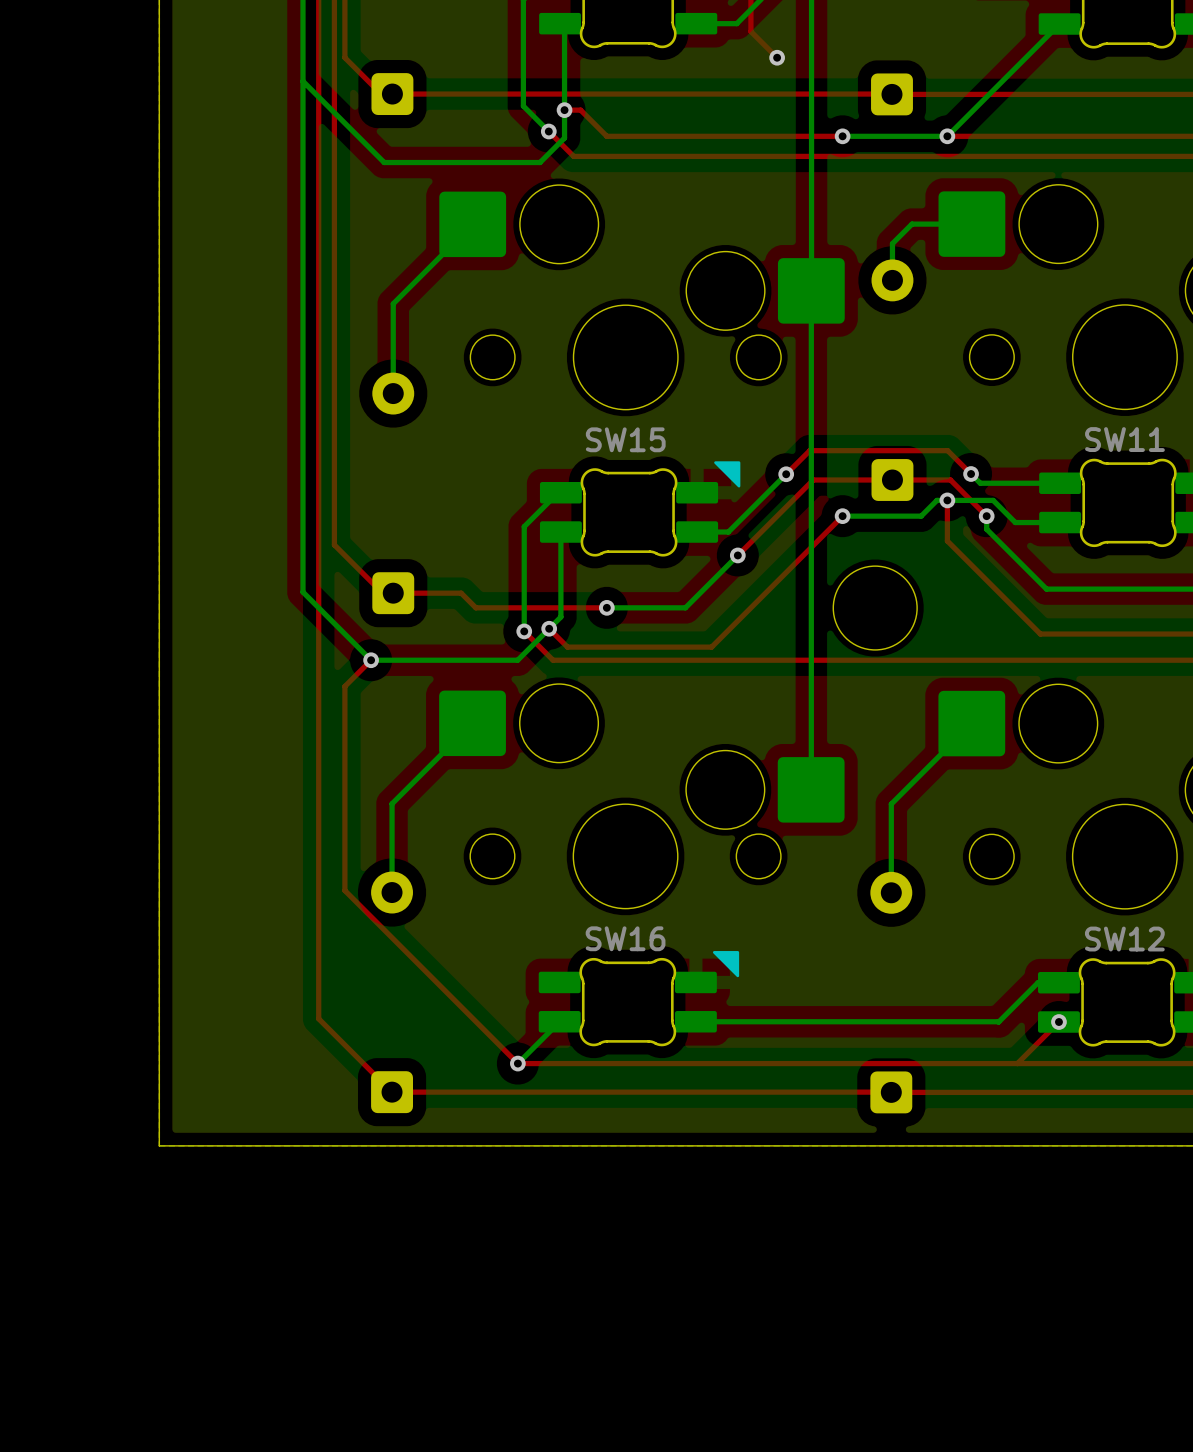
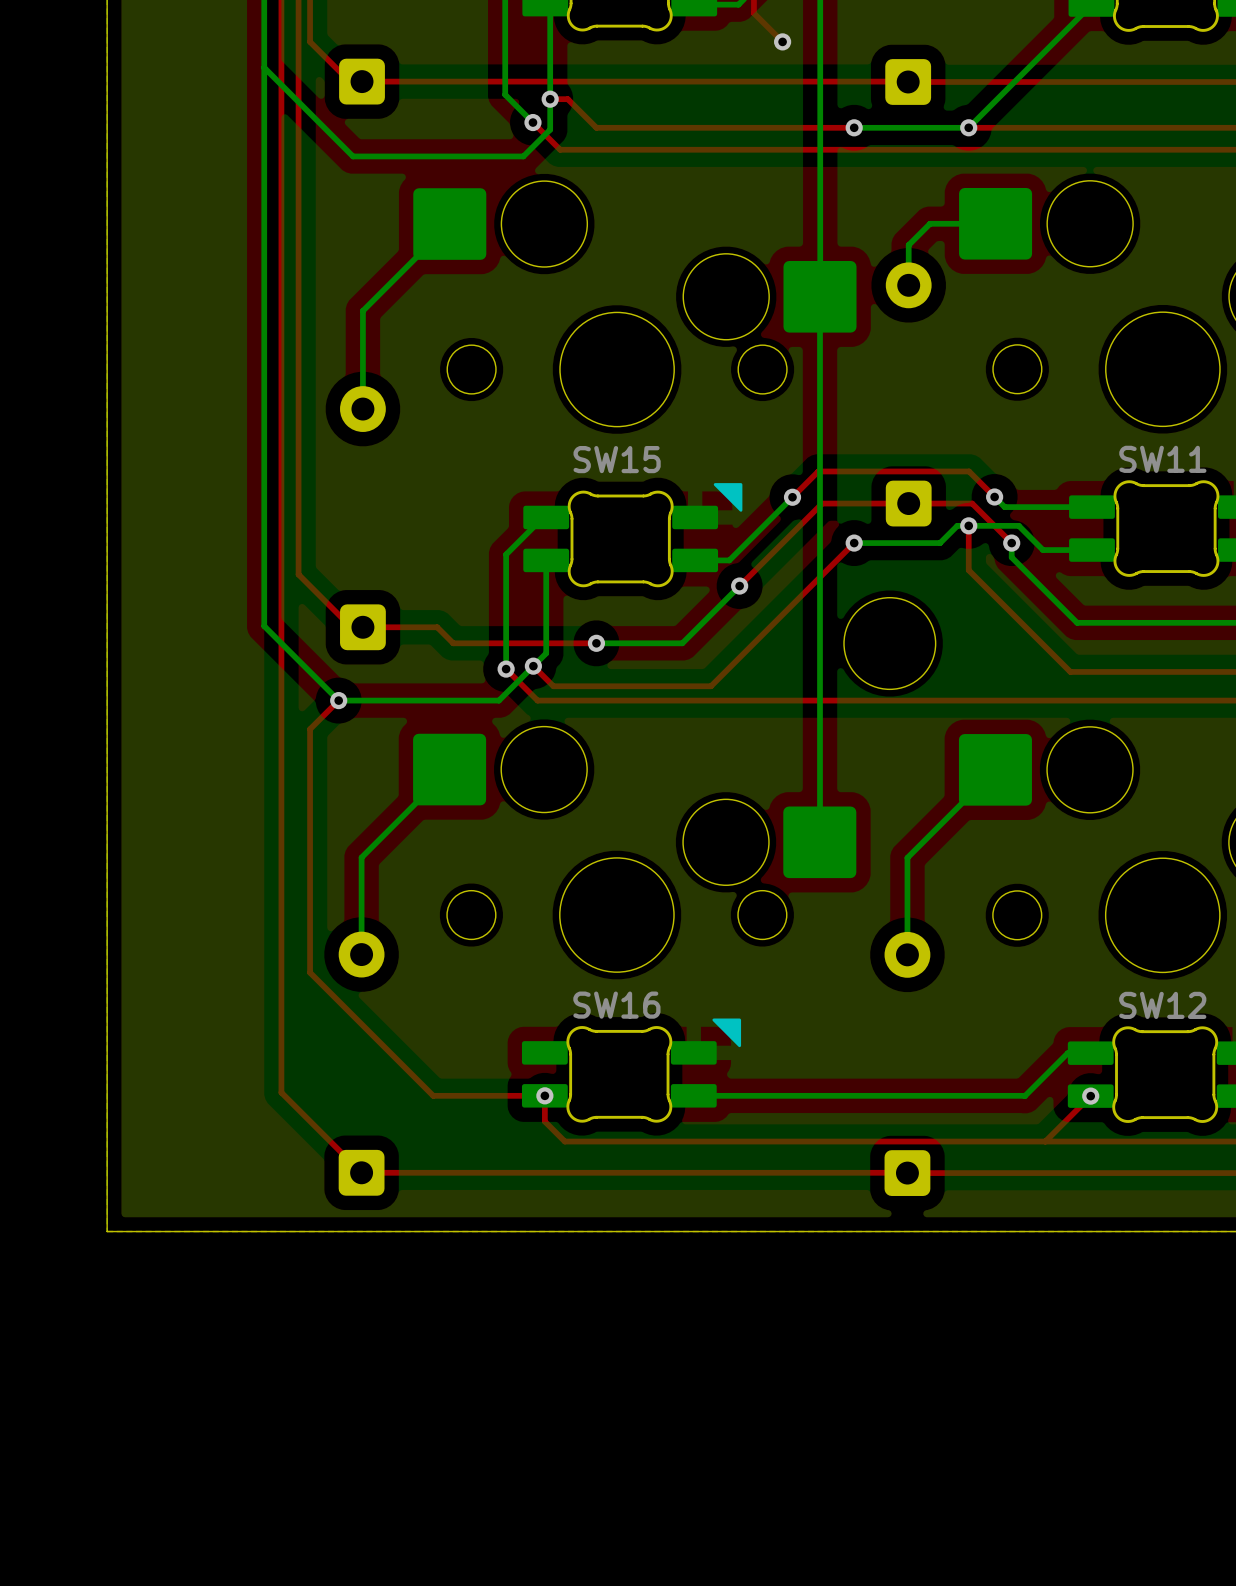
top track: (344, 890) (517, 1063) (577, 1063) -> (310, 952) (310, 972) (433, 1095) (544, 1095) (544, 1121) (564, 1141)
bottom track: (559, 1021) (517, 1063) -> none
via position: (517, 1063) -> (544, 1095)

